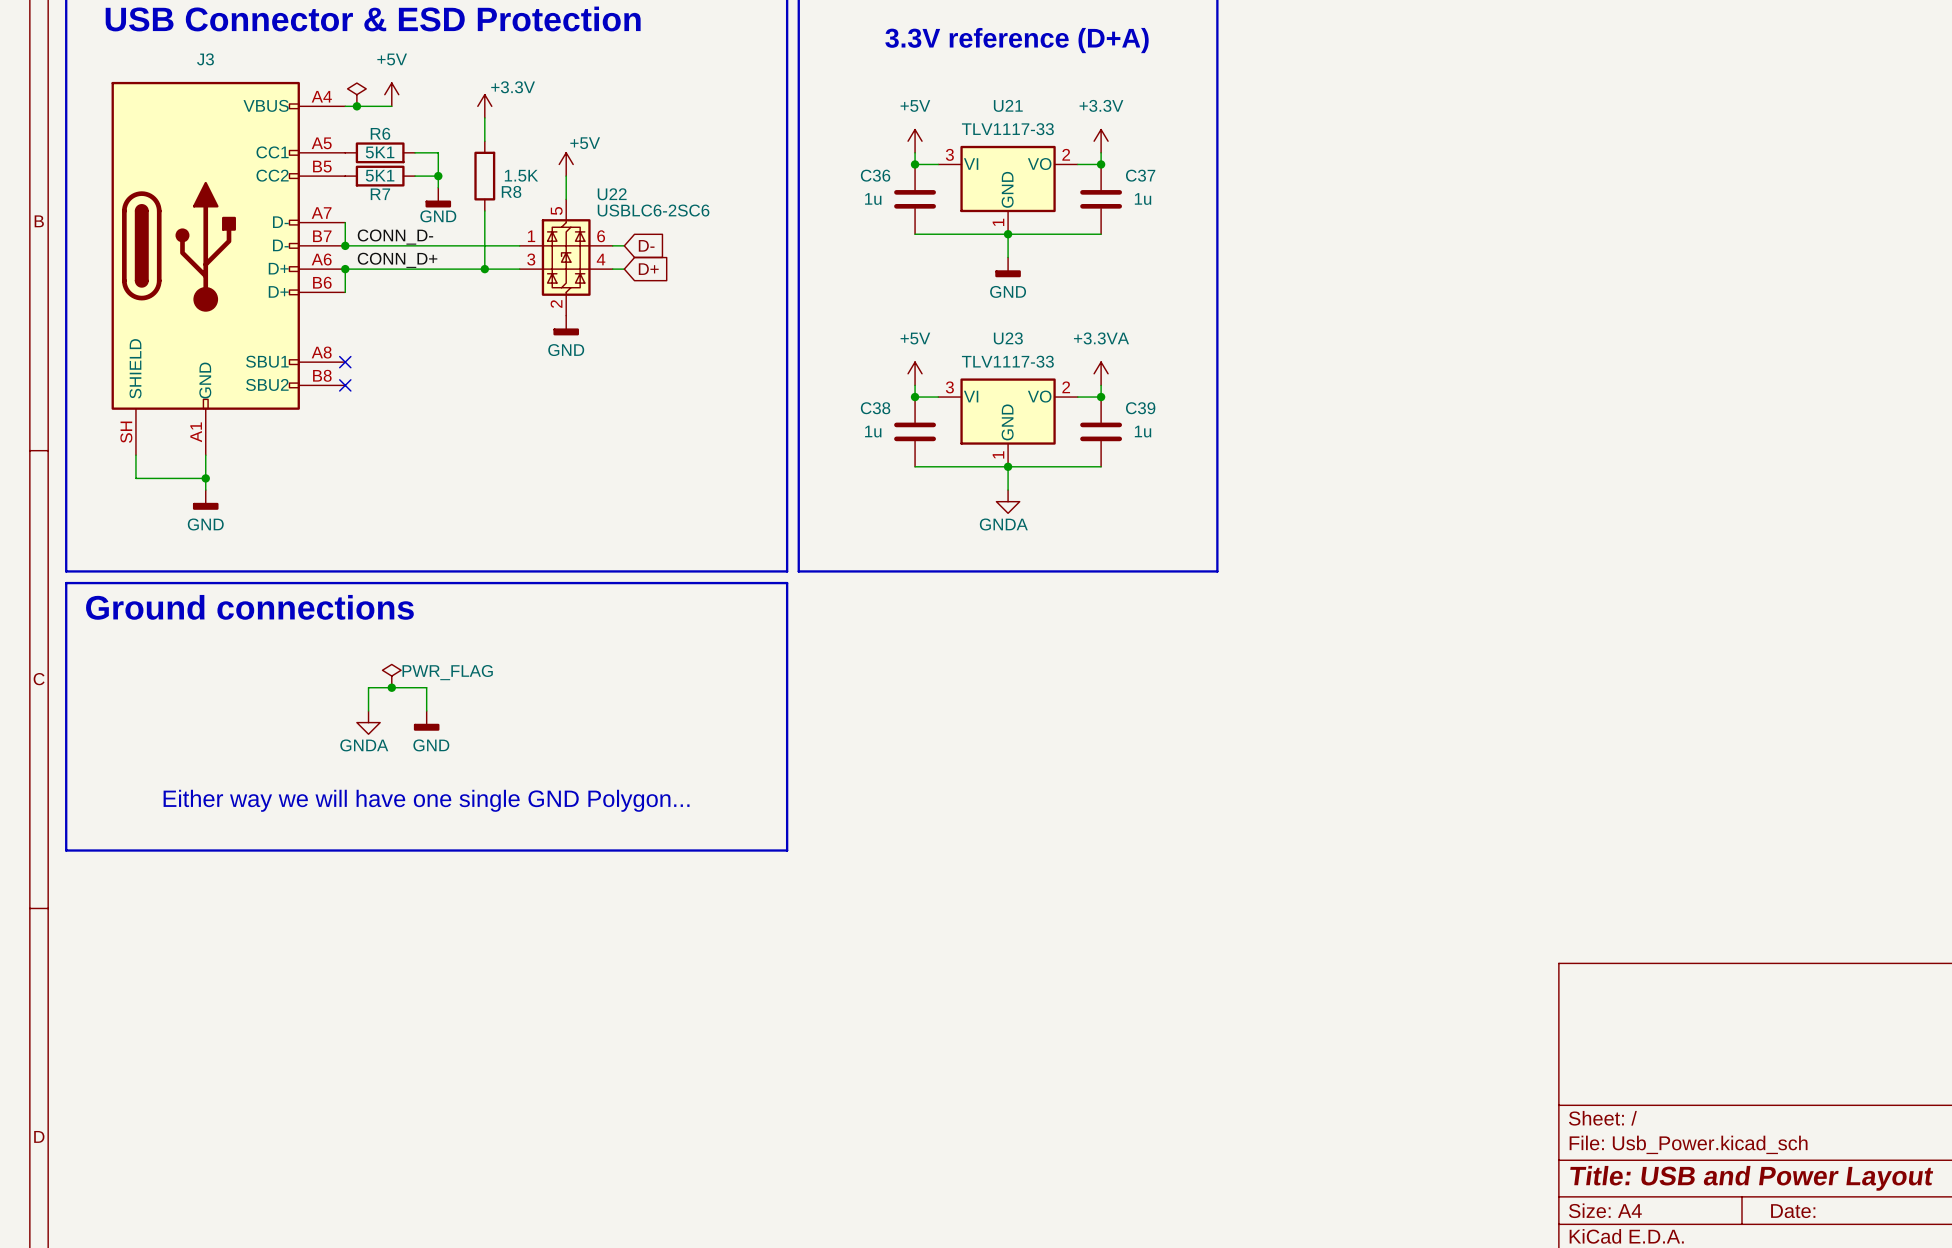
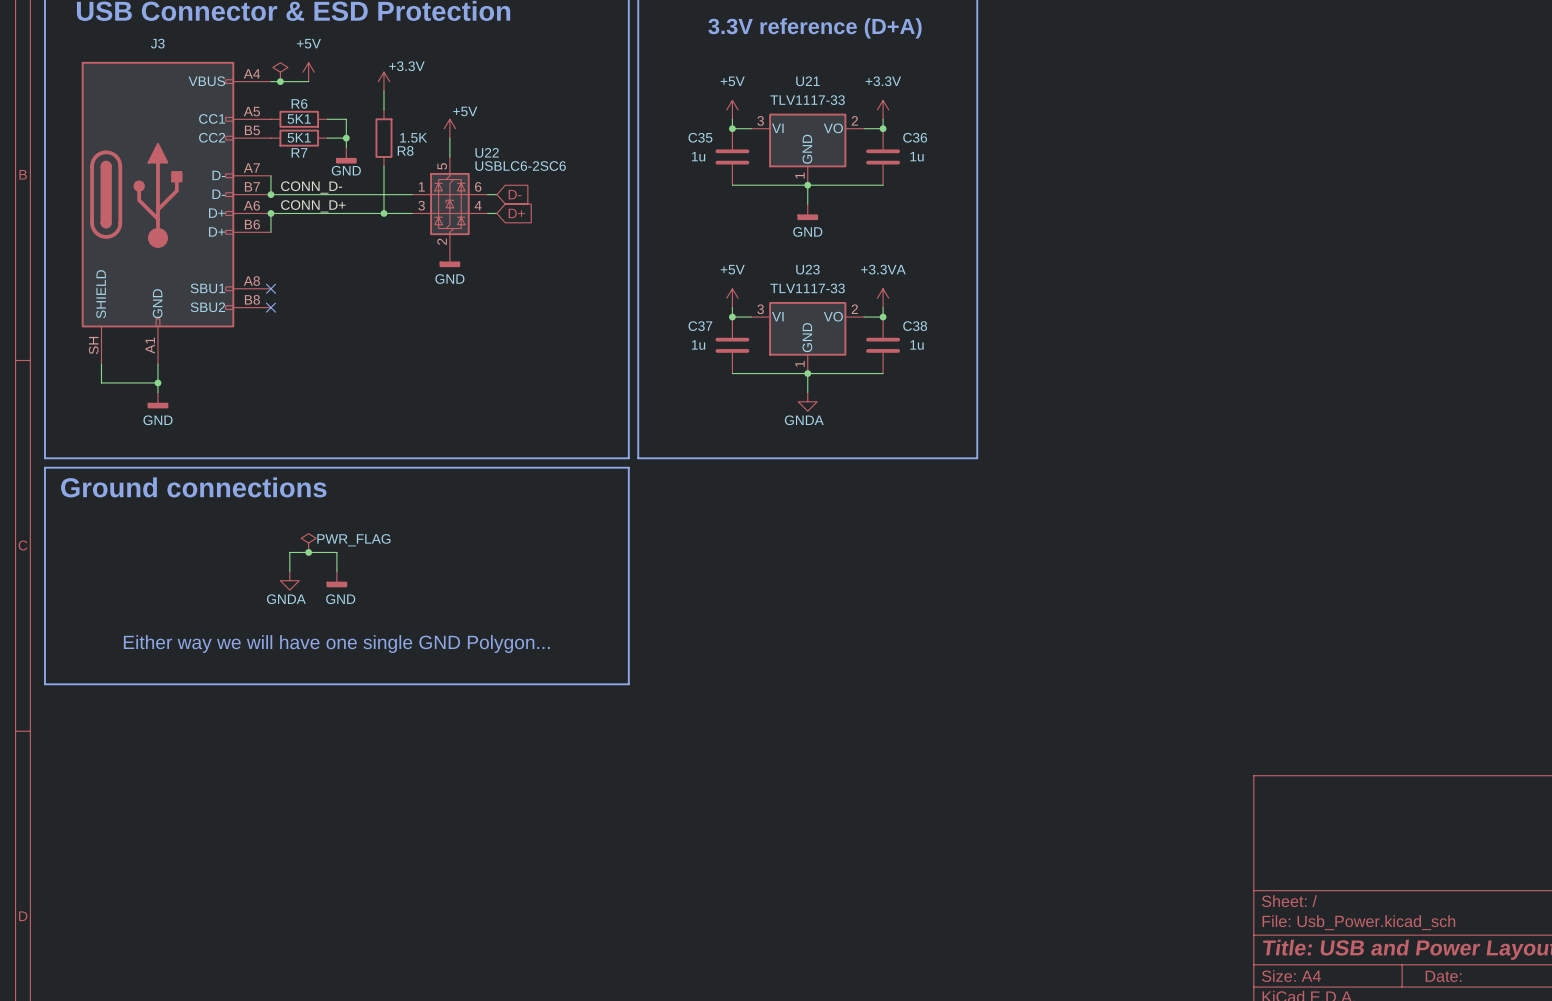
C36 name: C36 (875, 175) -> C35 (700, 137)
C37 name: C37 (1140, 175) -> C36 (915, 137)
C38 name: C38 (875, 408) -> C37 (700, 326)
C39 name: C39 (1140, 408) -> C38 (915, 326)

